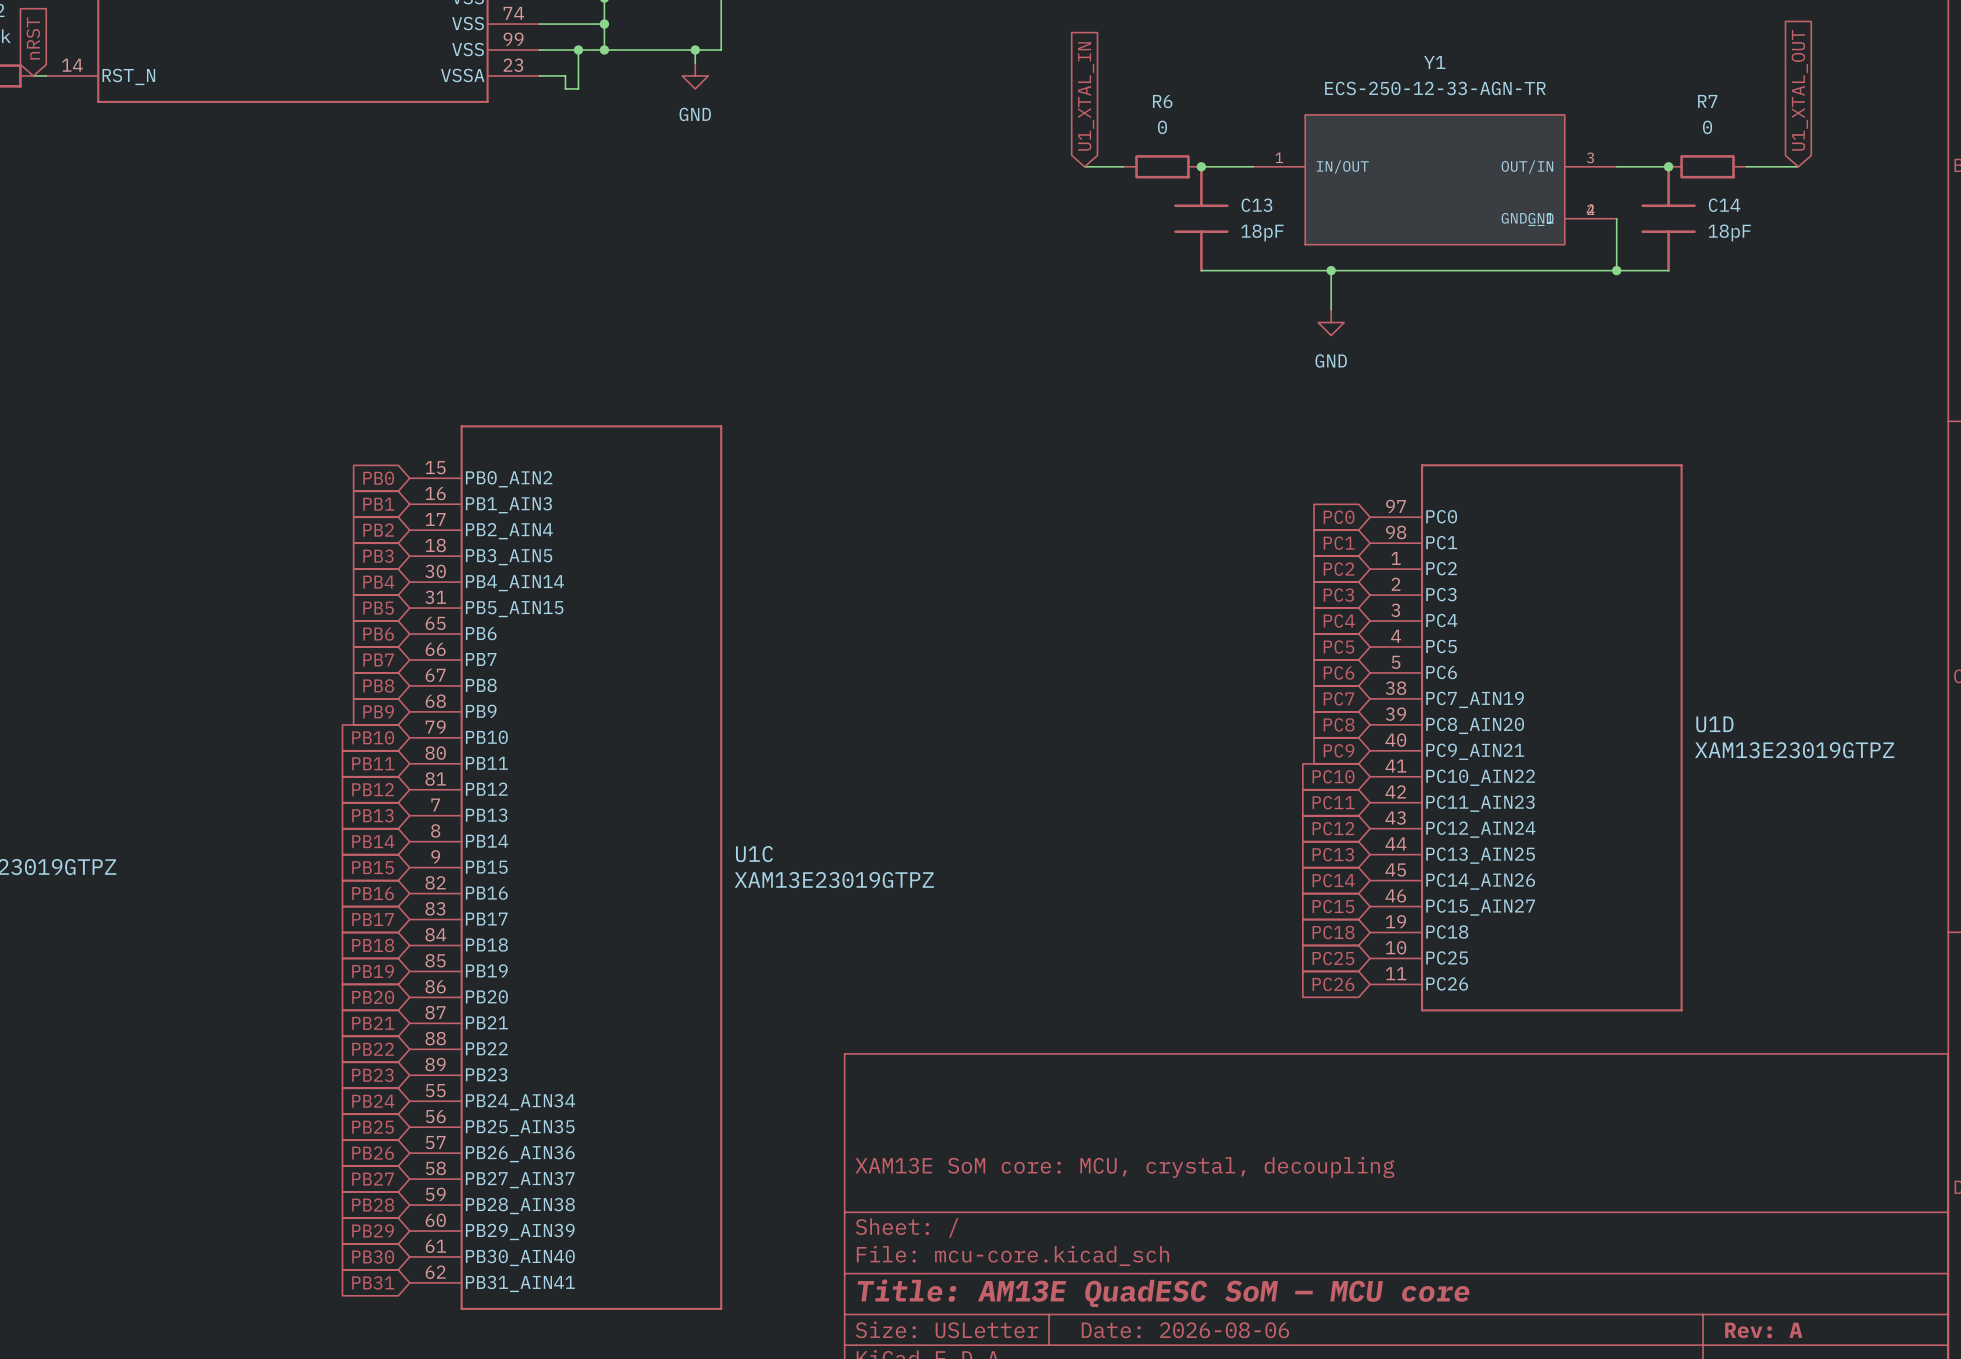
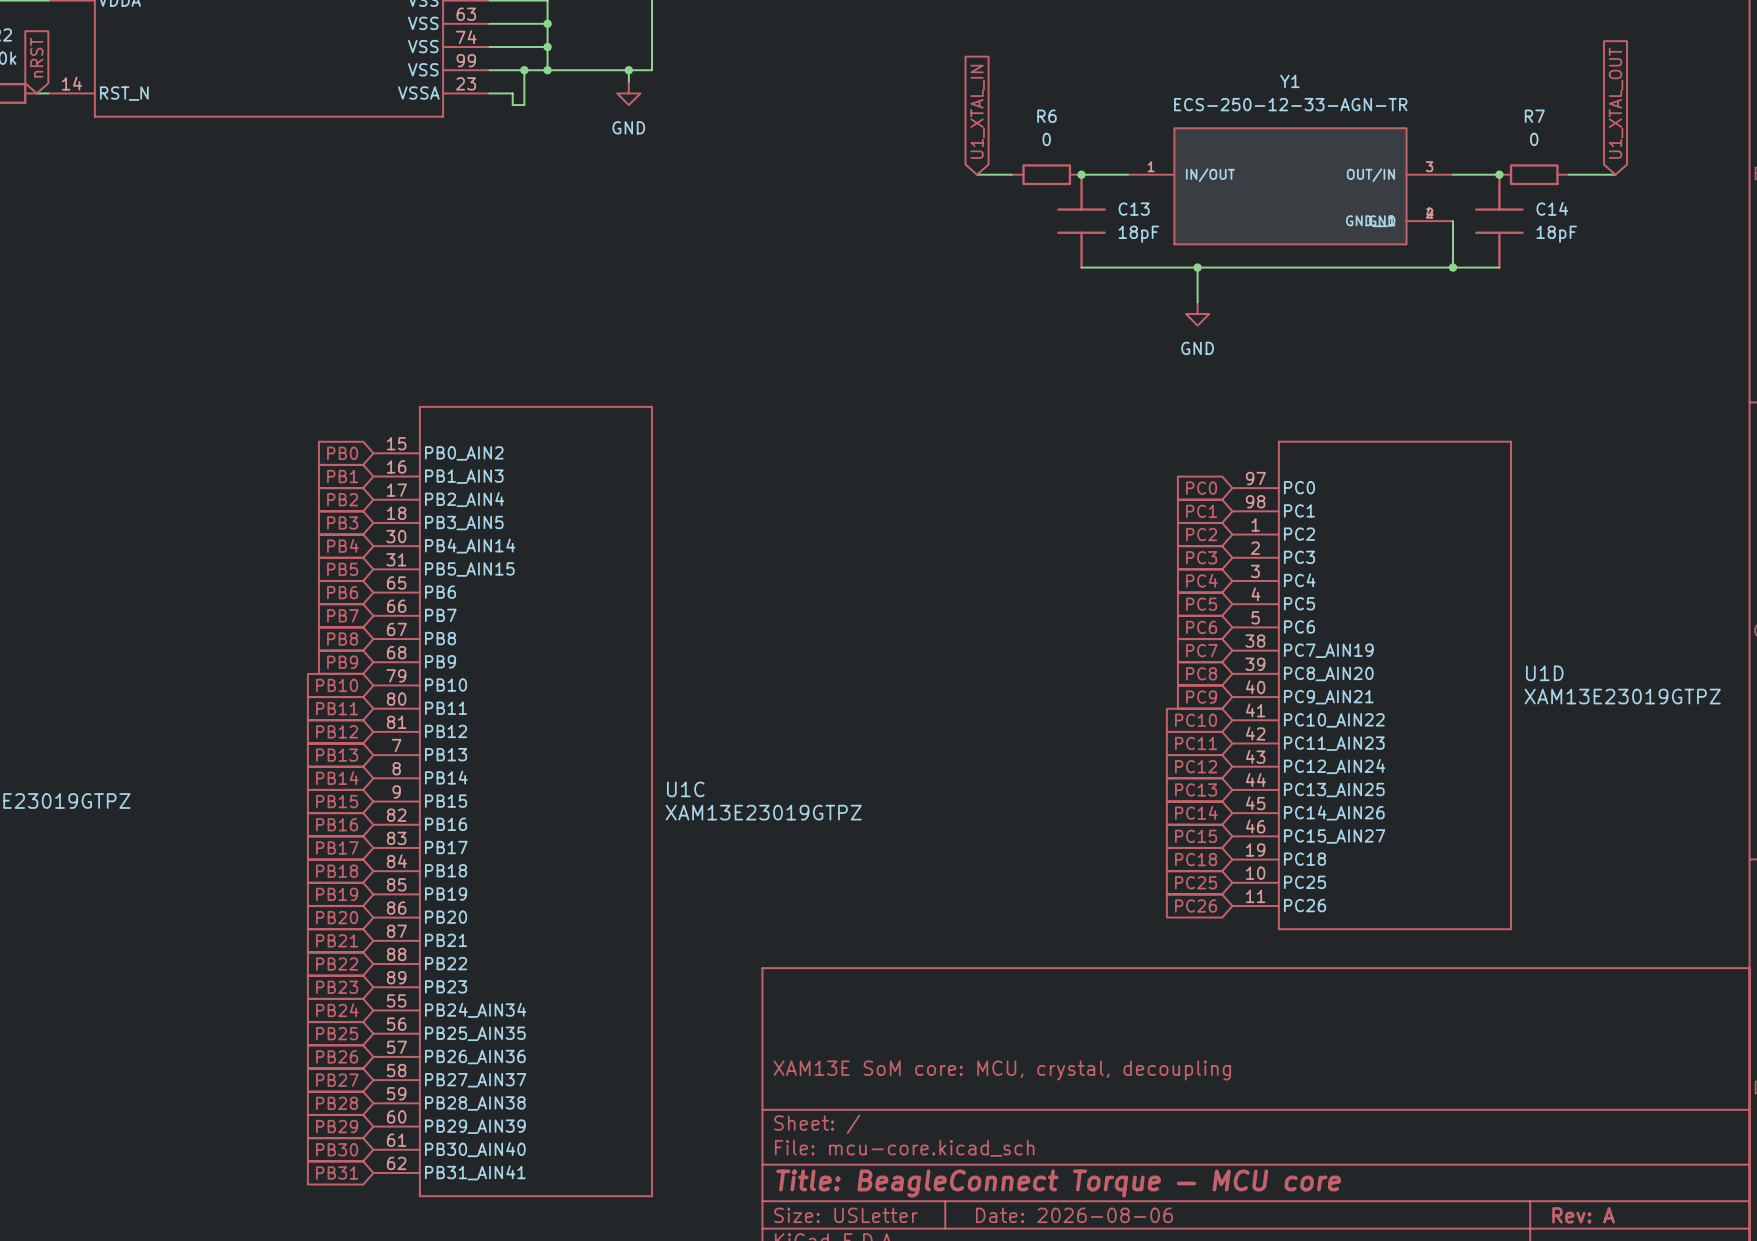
title block: Title: AM13E QuadESC SoM — MCU core (1163, 1293) -> Title: BeagleConnect Torque — MCU core (1058, 1183)

